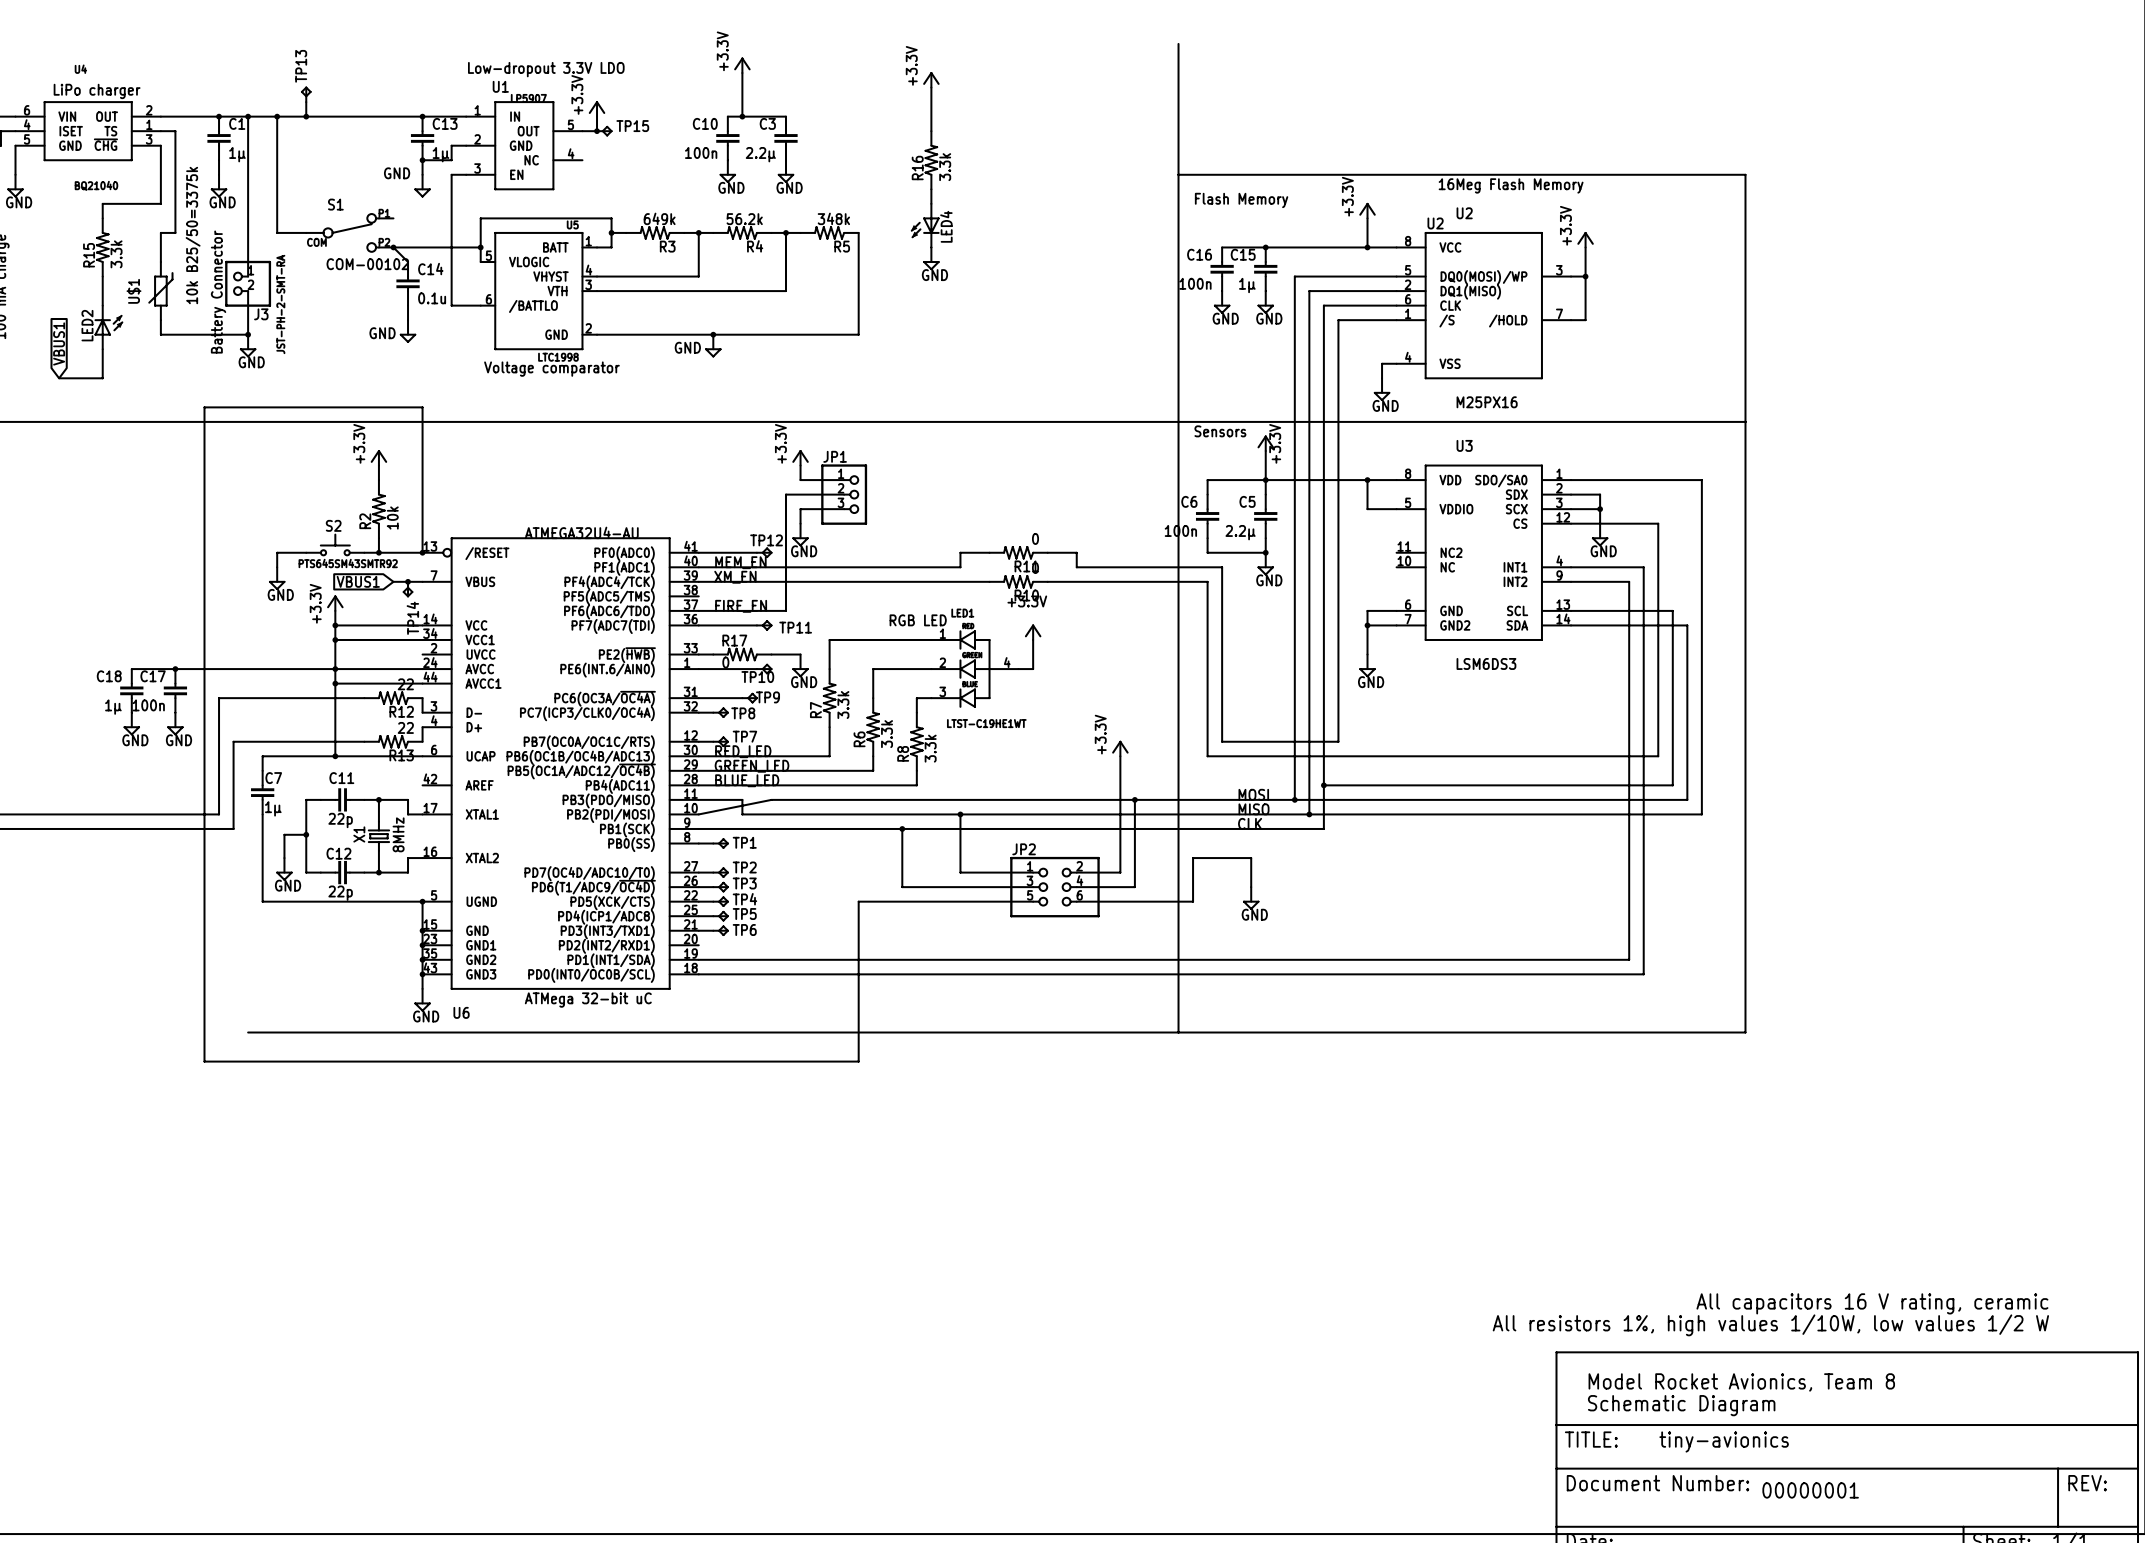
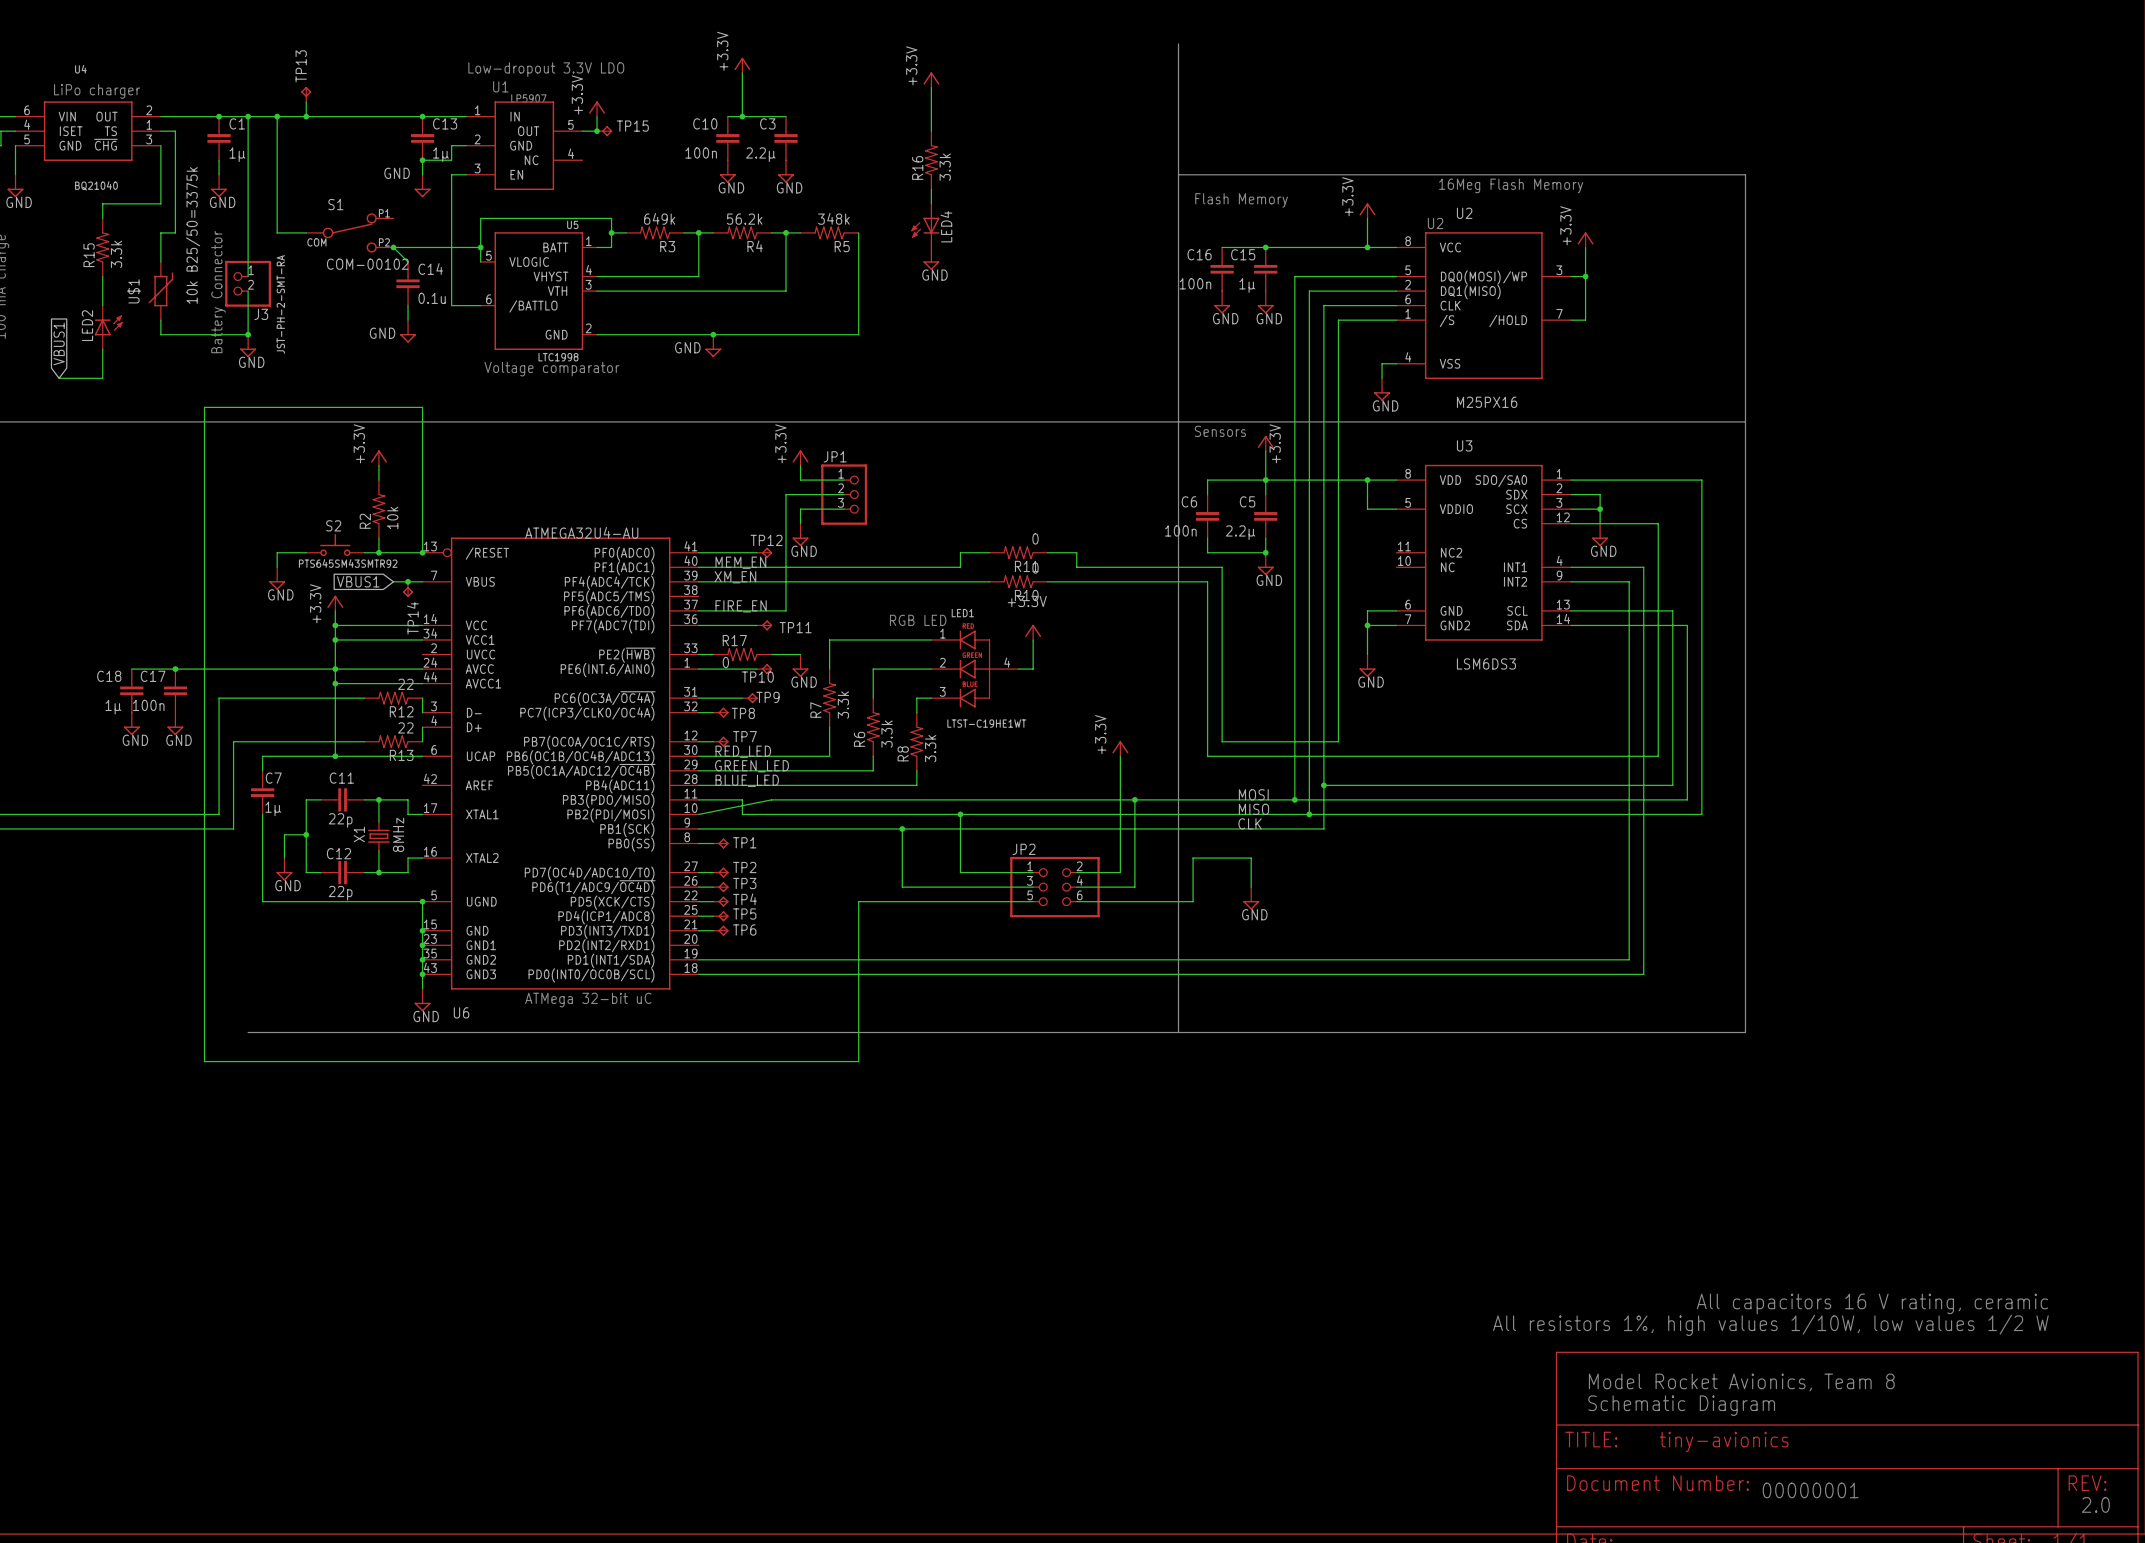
text: none -> 2.0 (2095, 1504)

